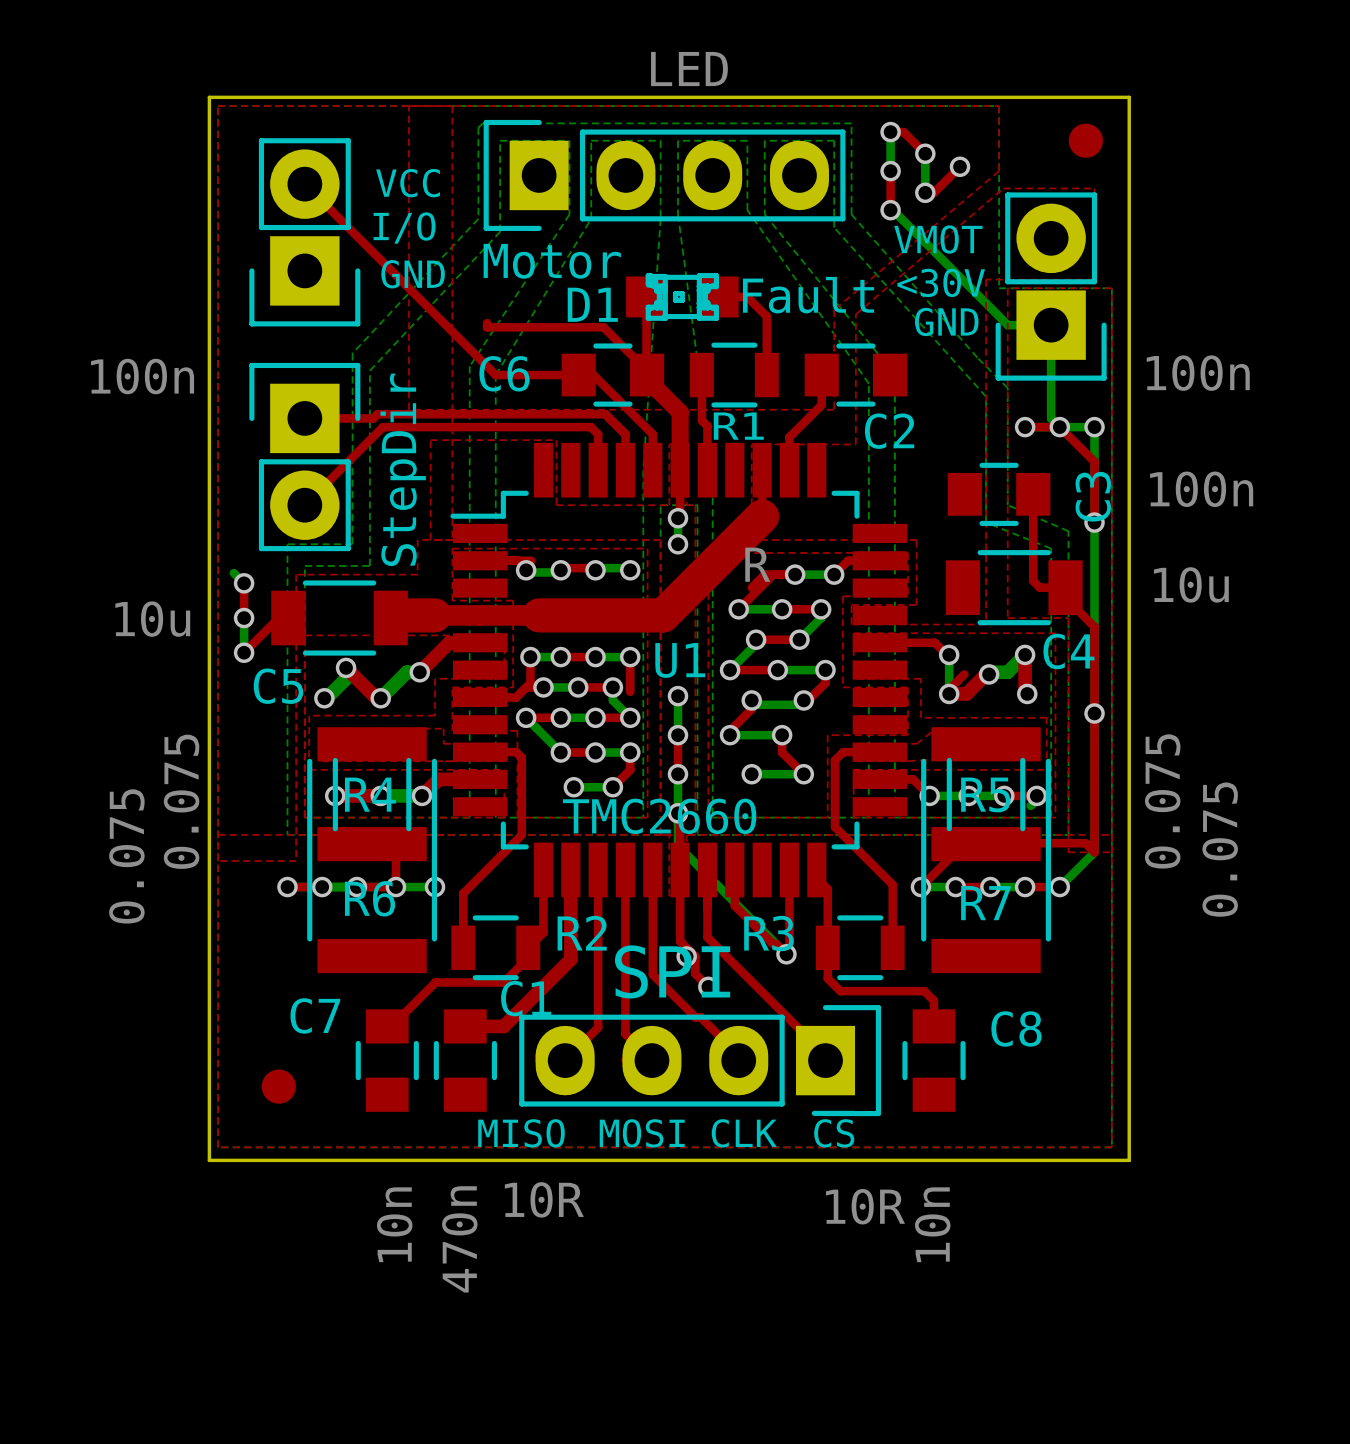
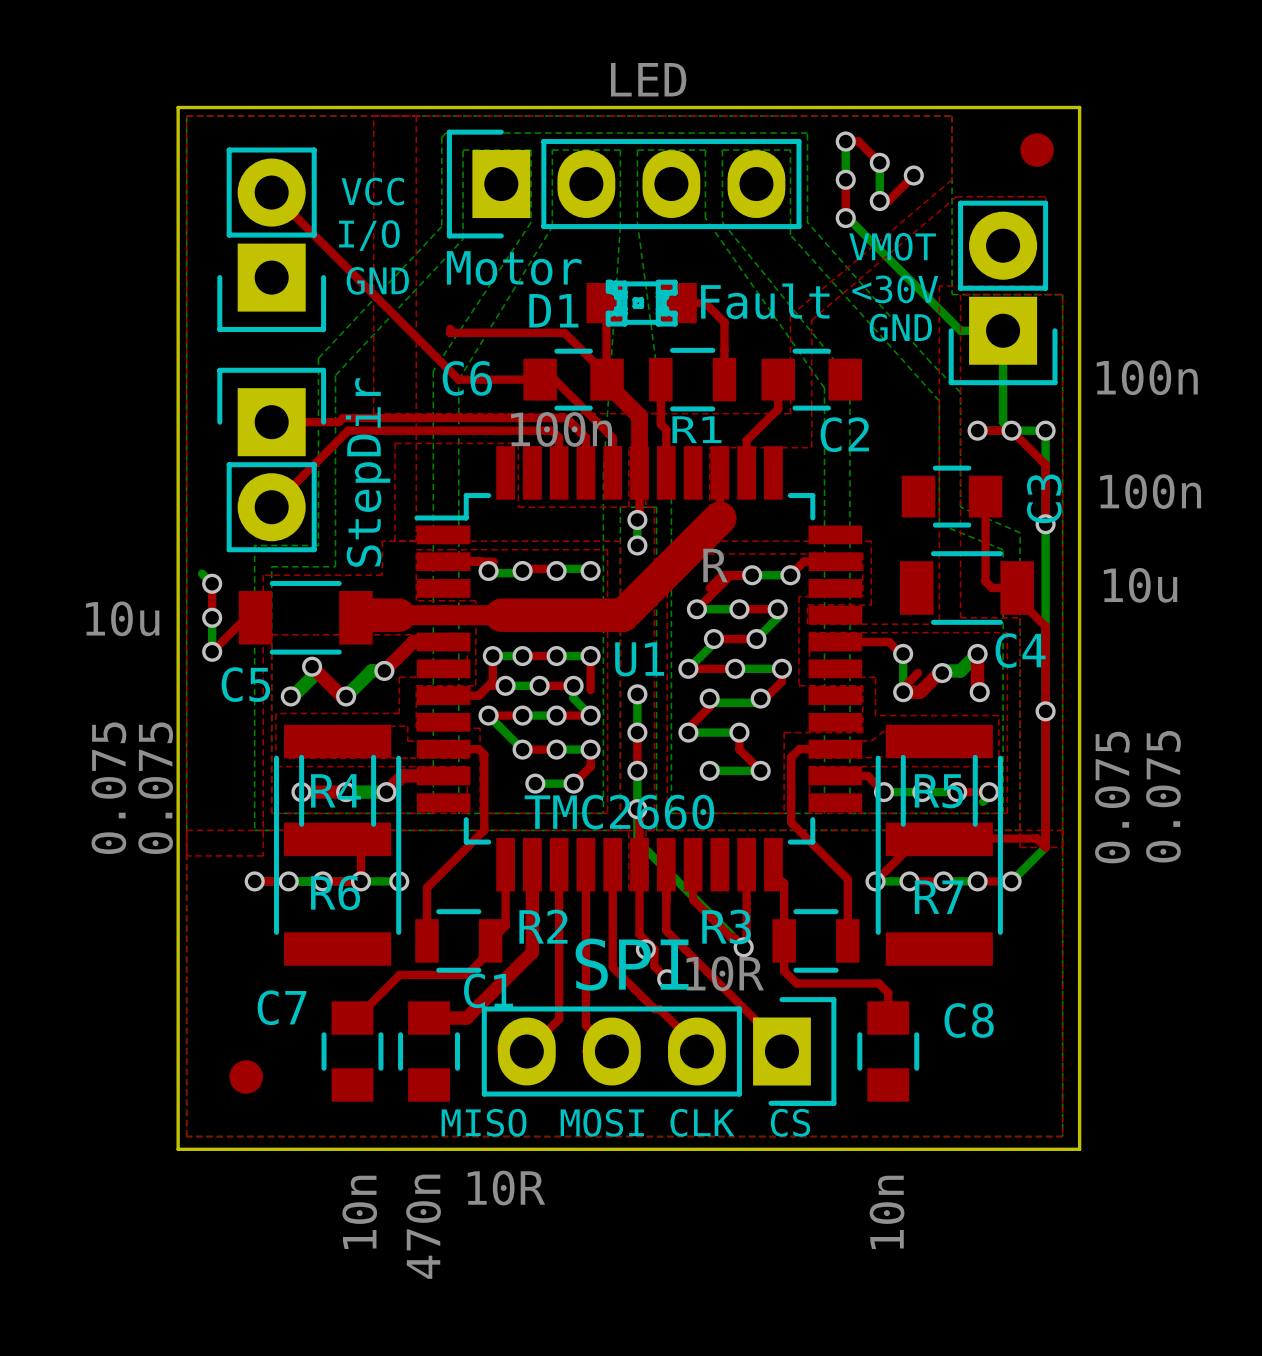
C6 value position: 100n (142, 376) -> 100n (561, 429)
R4 value position: 0.075 (181, 801) -> 0.075 (108, 788)
R7 value position: 0.075 (1220, 849) -> 0.075 (1163, 796)
R6 value position: 0.075 (126, 856) -> 0.075 (155, 788)
R3 value position: 10R (865, 1206) -> 10R (725, 973)

